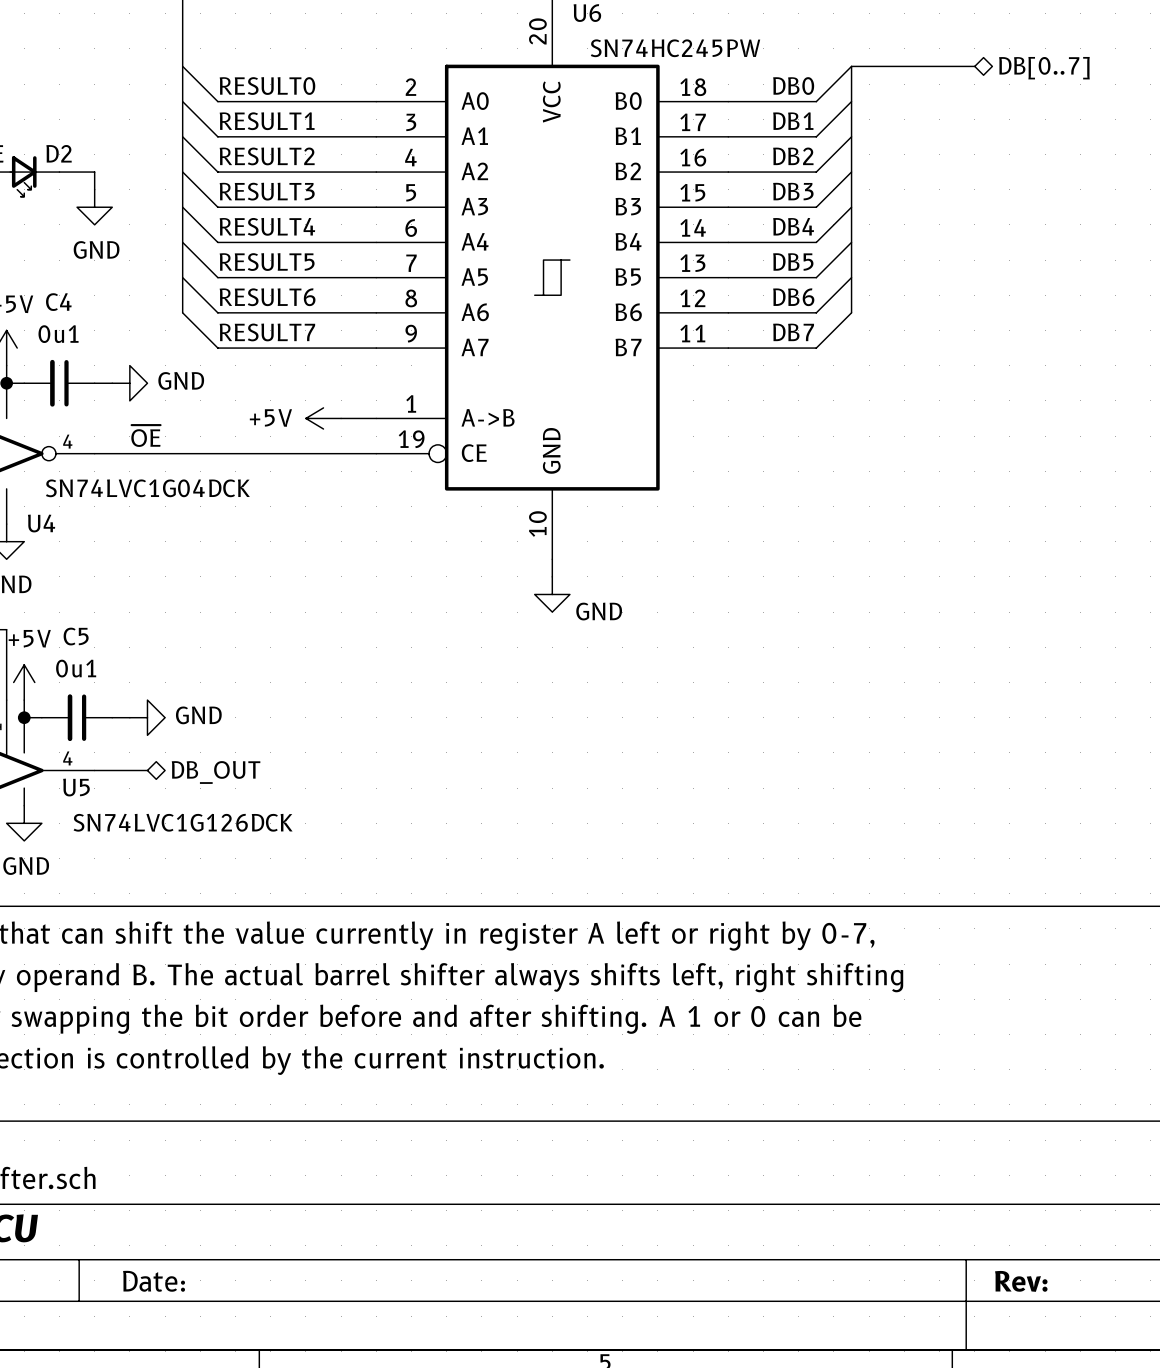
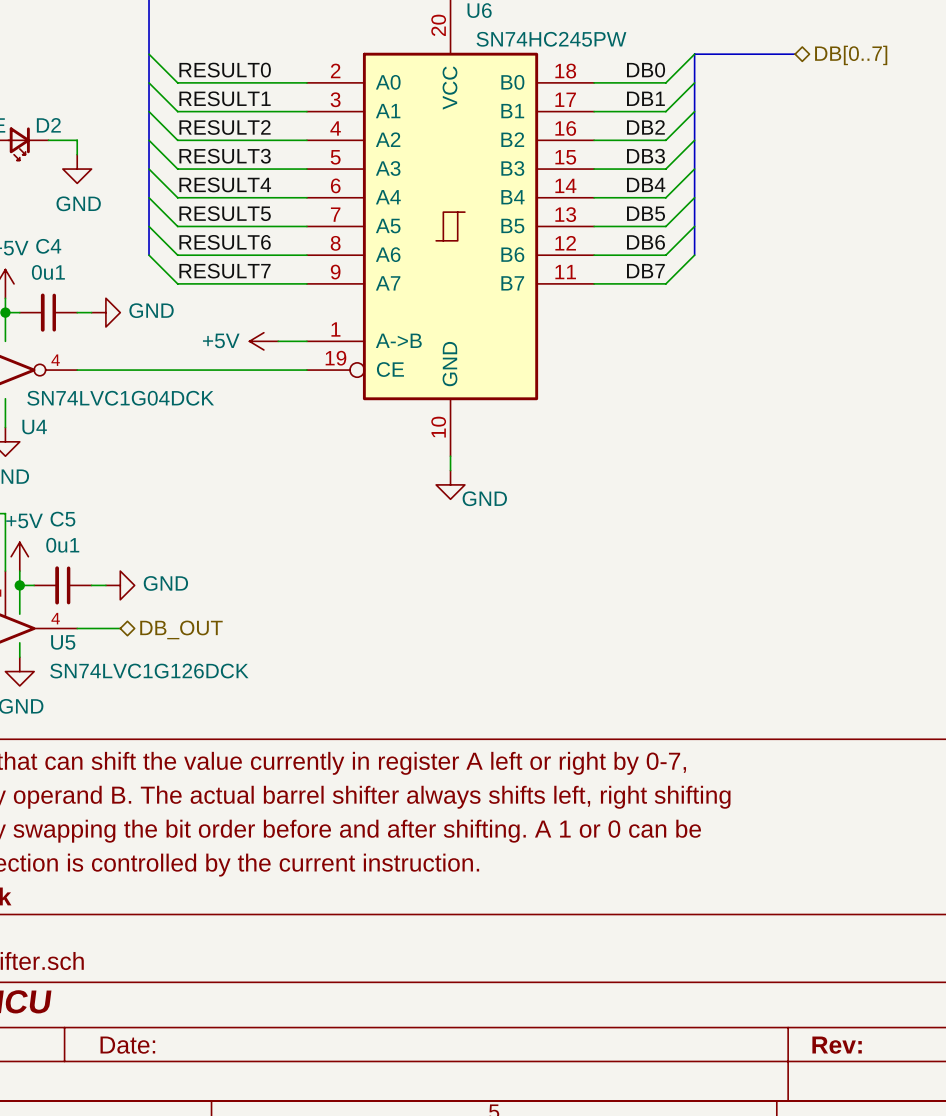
label: ~{OE} (145, 436) -> none

